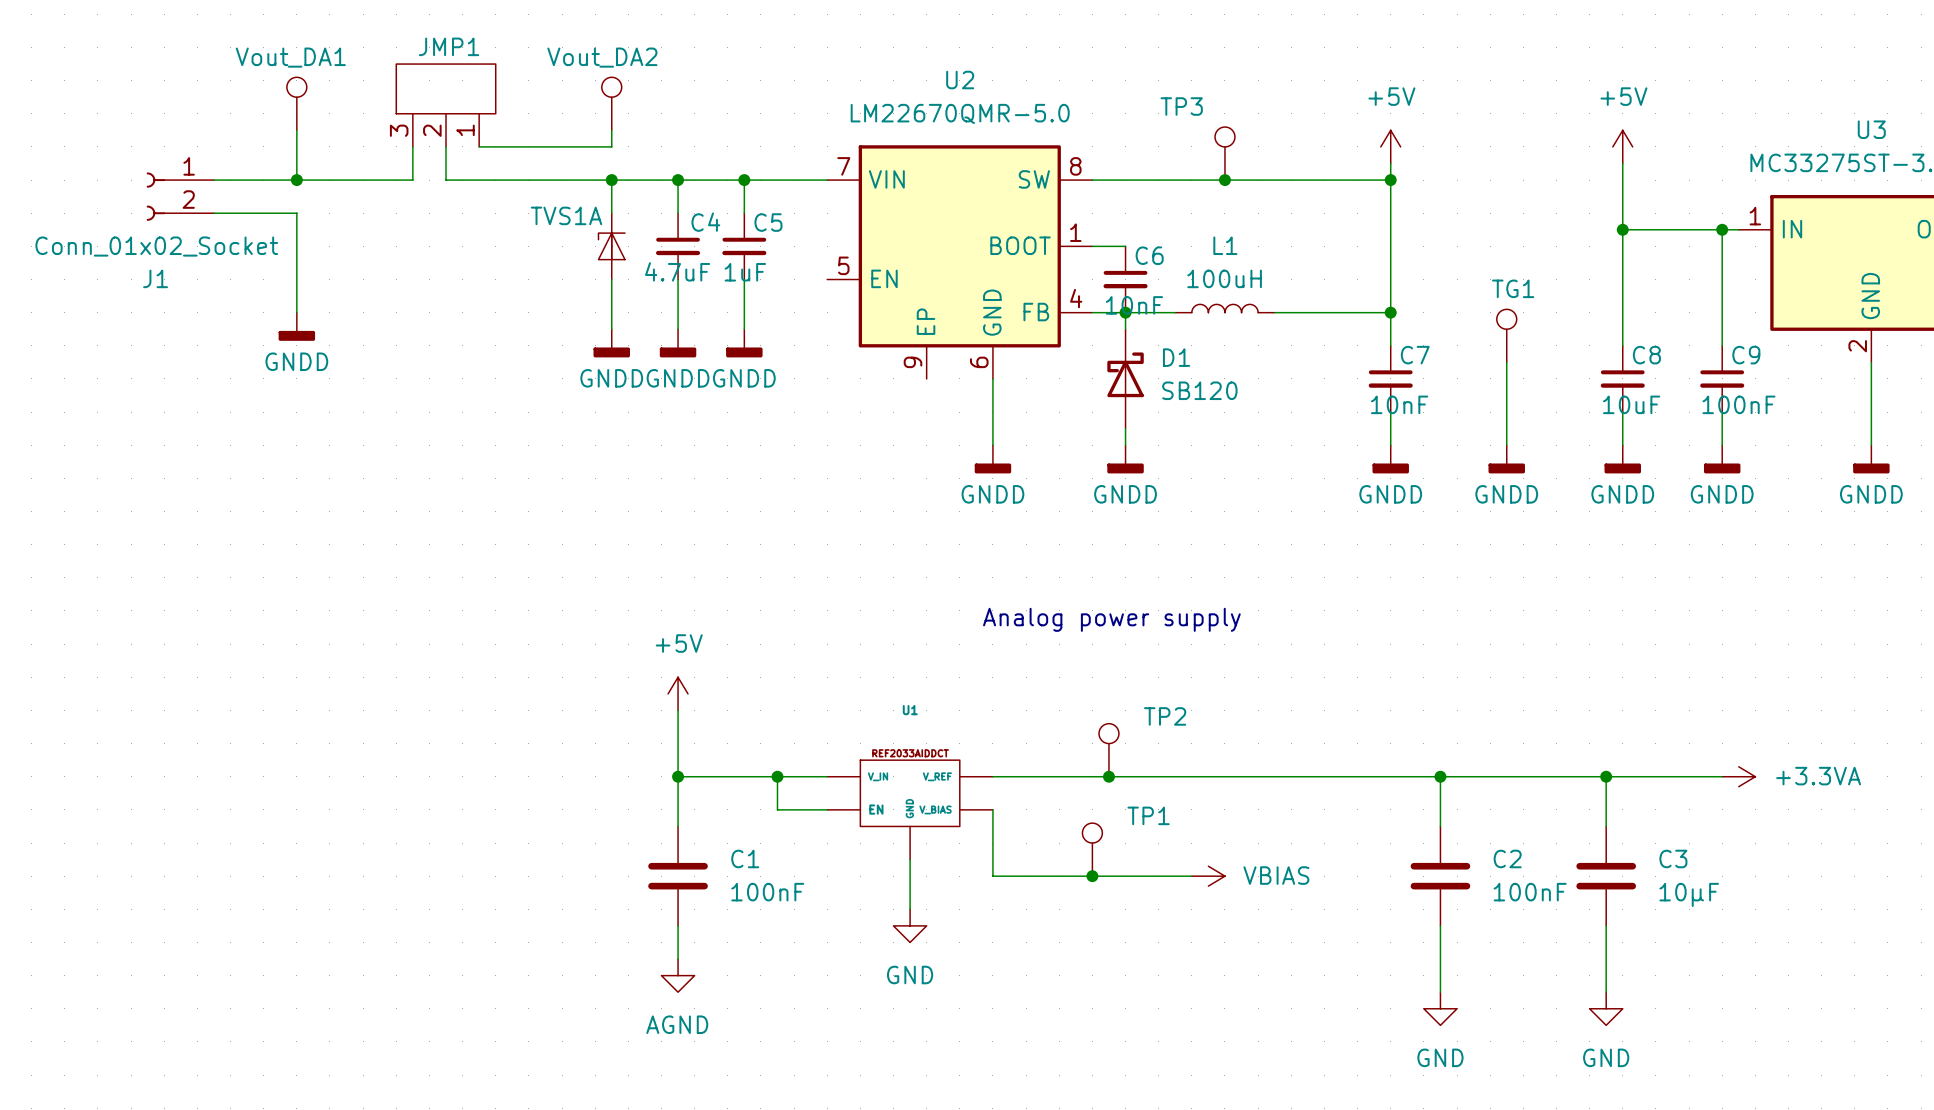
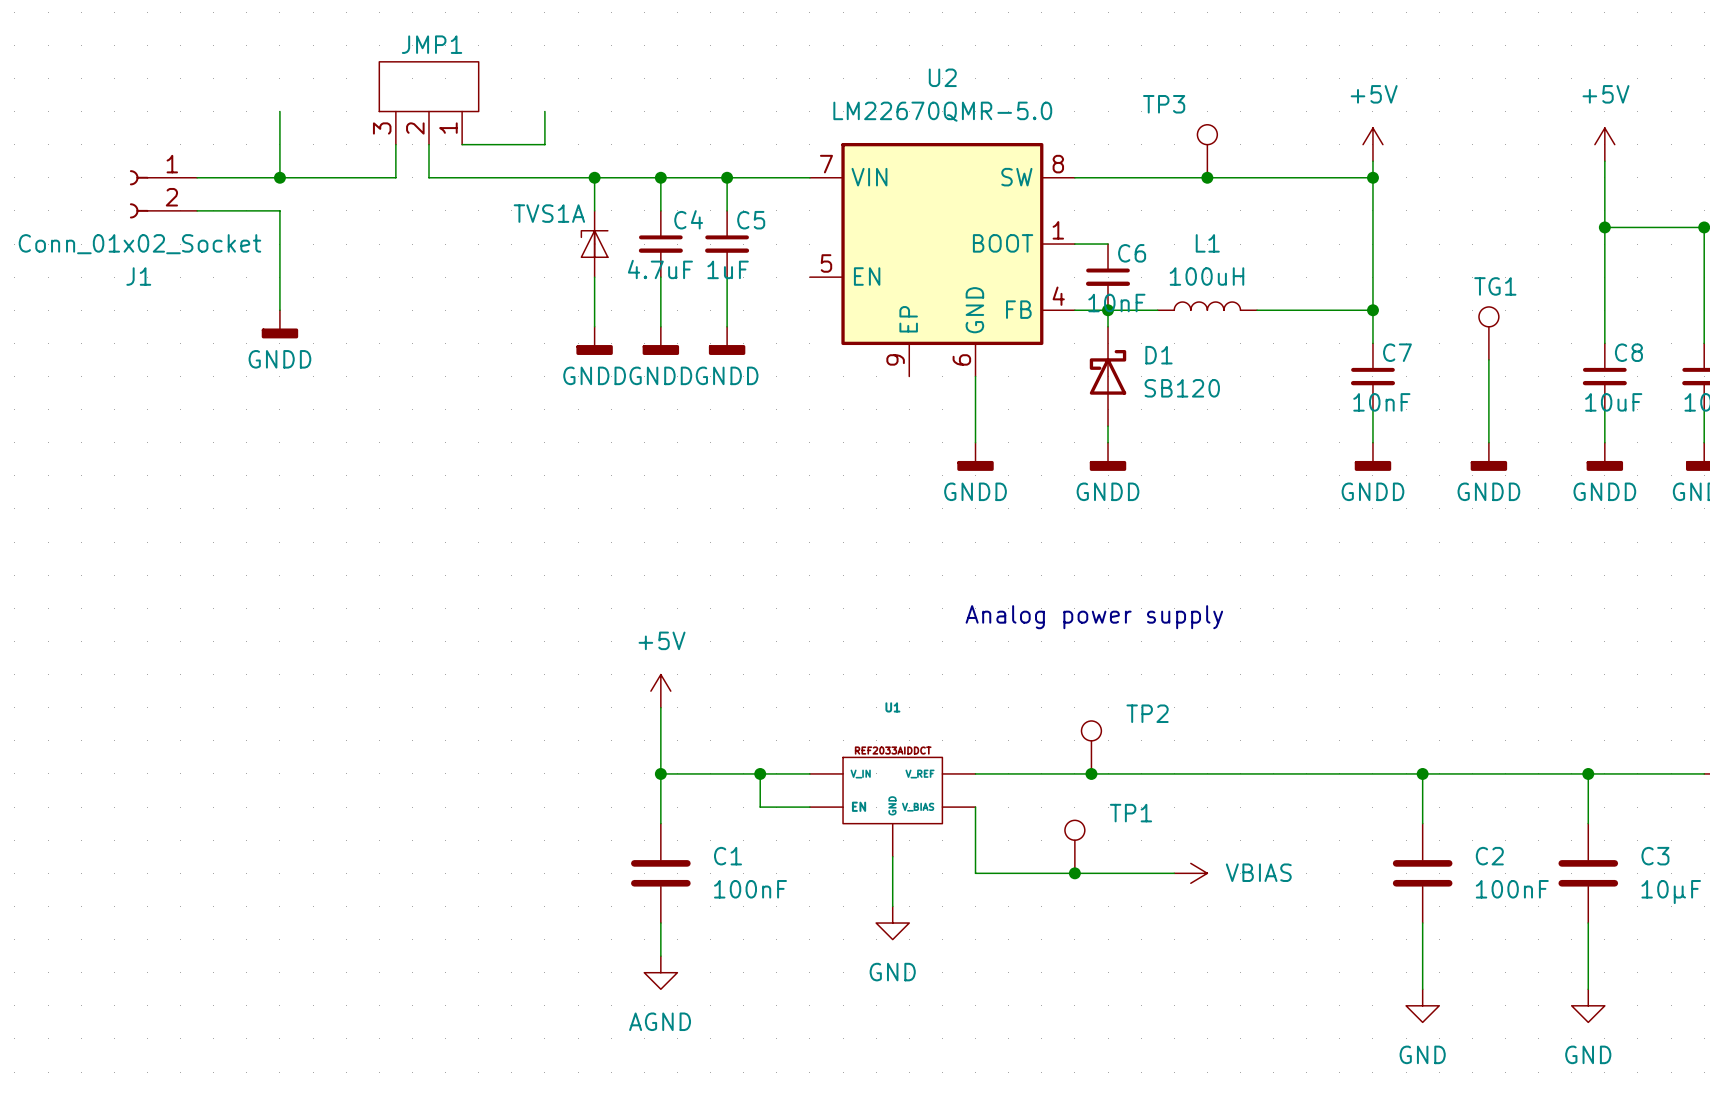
Vout_DA1: (296, 103) -> none
Vout_DA2: (611, 103) -> none
wire: (611, 130) (611, 146) (562, 146) -> (544, 111) (544, 144)

